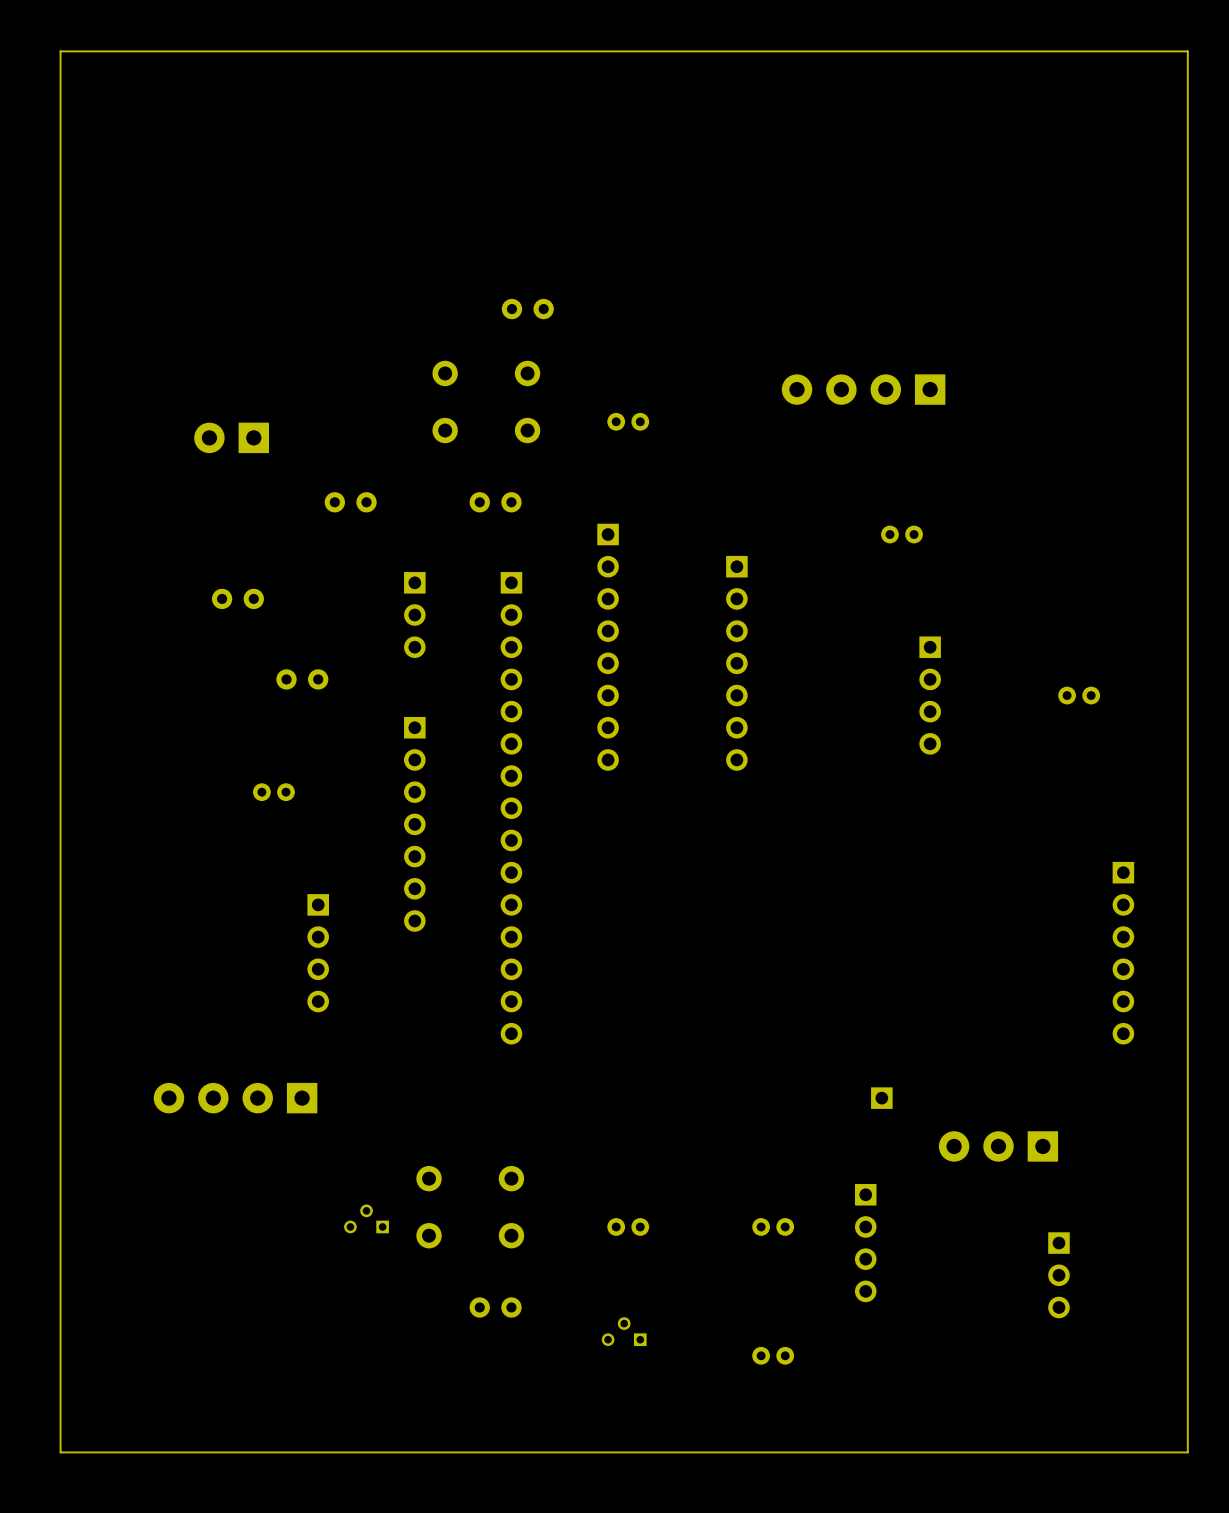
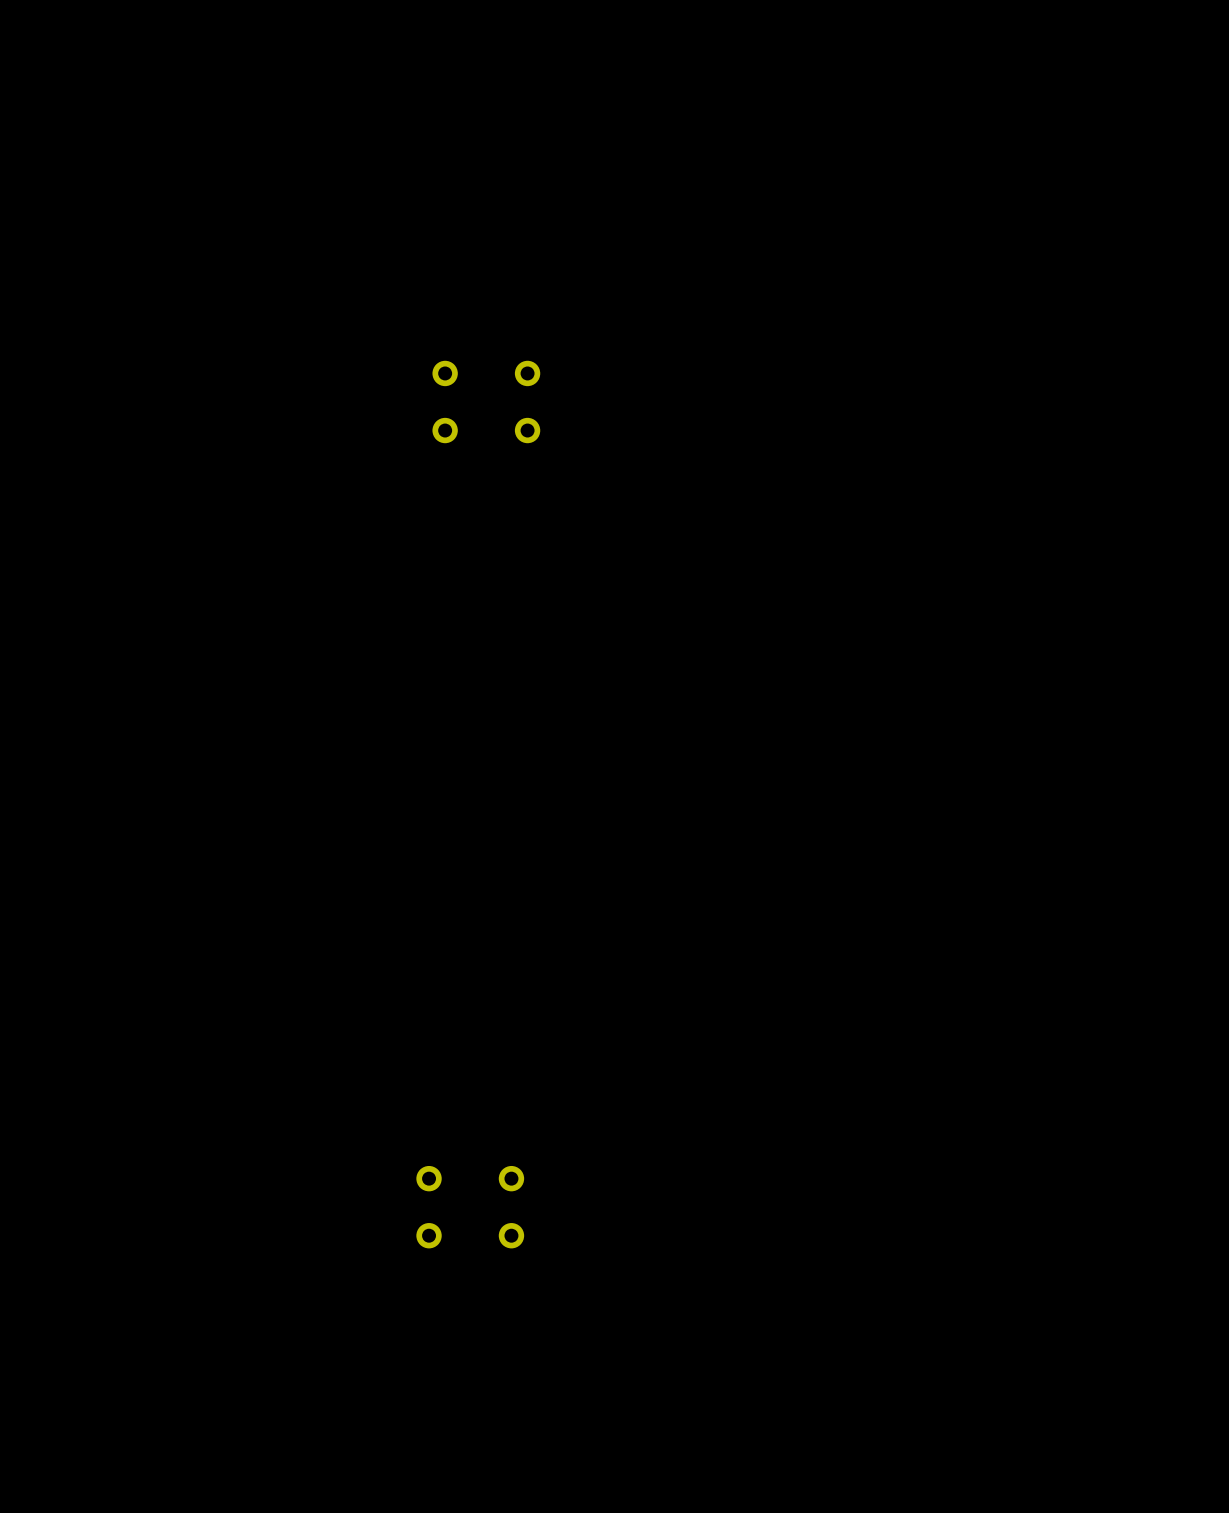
board edge: (1187, 51) (1187, 1452) (60, 1452) (60, 51) (1187, 51) -> none
part: (527, 309) -> none
part: (863, 389) -> none
part: (628, 421) -> none
part: (231, 437) -> none
part: (350, 502) -> none
part: (495, 502) -> none
part: (902, 534) -> none
part: (237, 598) -> none
part: (414, 615) -> none
part: (608, 647) -> none
part: (736, 663) -> none
part: (302, 679) -> none
part: (930, 695) -> none
part: (1079, 695) -> none
part: (273, 792) -> none
part: (511, 808) -> none
part: (414, 824) -> none
part: (318, 953) -> none
part: (1123, 953) -> none
part: (235, 1098) -> none
part: (881, 1098) -> none
part: (998, 1146) -> none
part: (366, 1218) -> none
part: (628, 1226) -> none
part: (773, 1226) -> none
part: (865, 1243) -> none
part: (1058, 1275) -> none
part: (495, 1307) -> none
part: (624, 1331) -> none
part: (773, 1355) -> none

